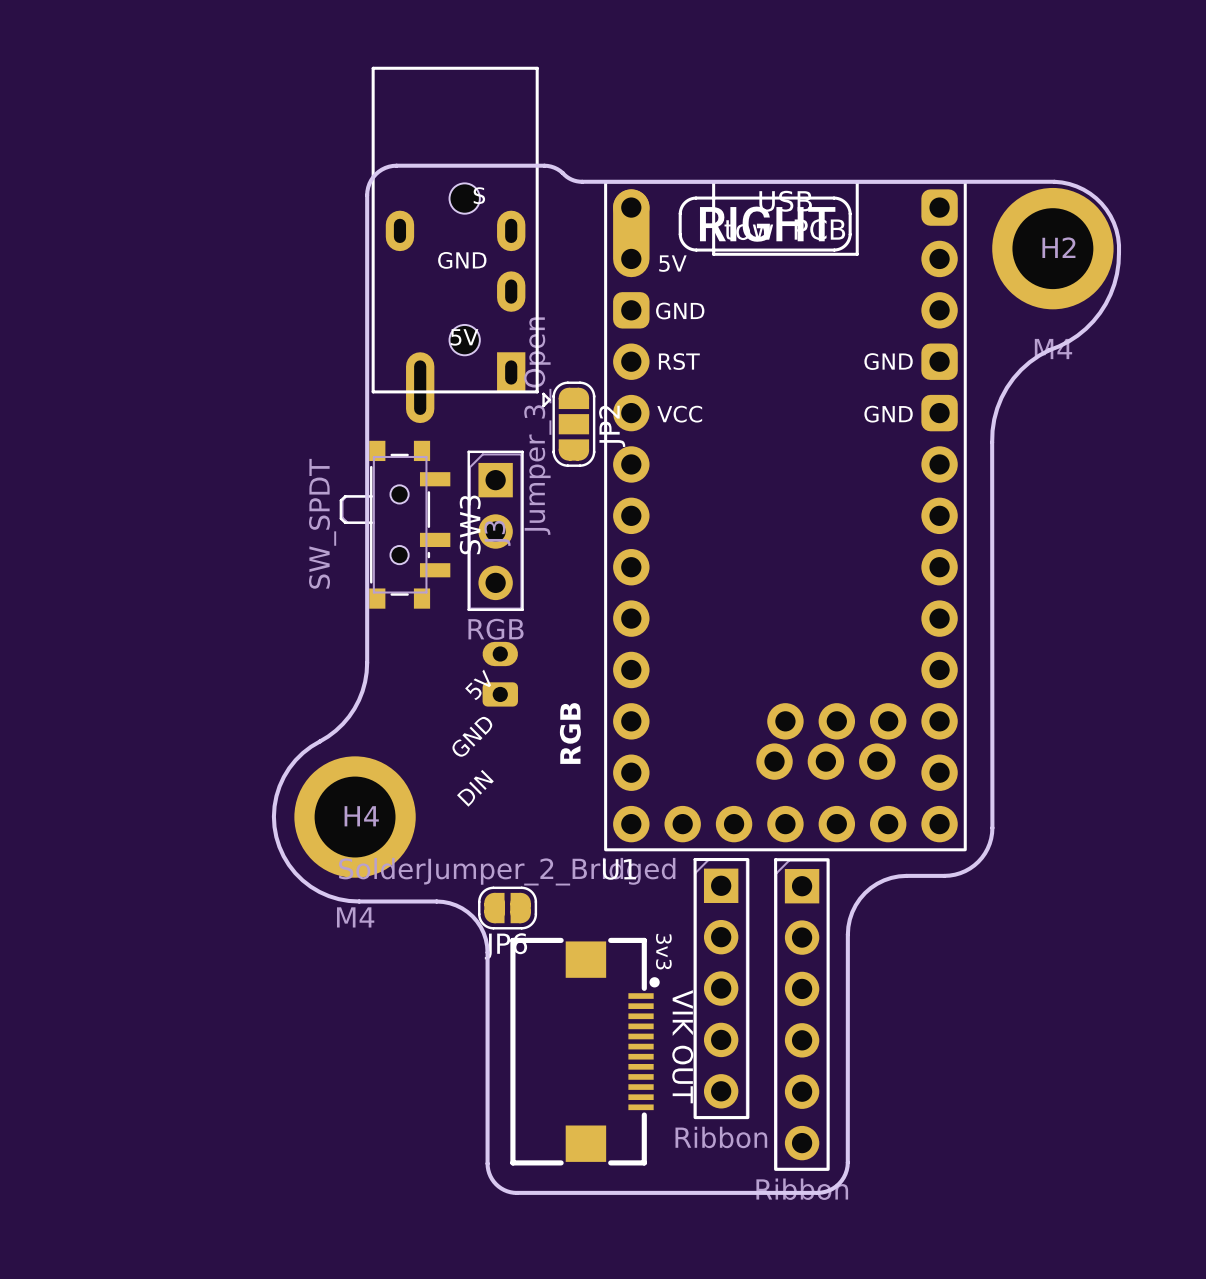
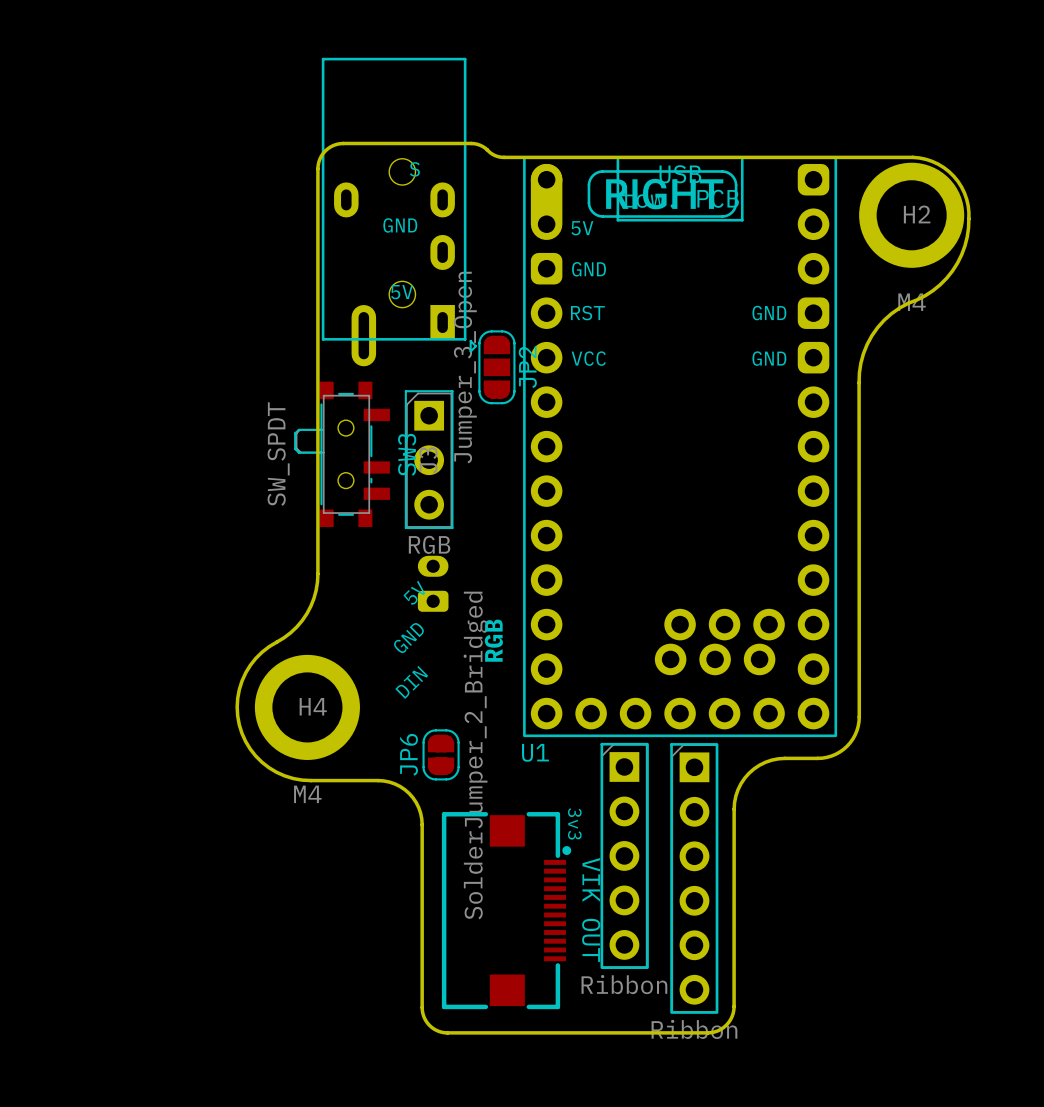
JP6 rotation: 0° (507, 908) -> 90° clockwise (441, 754)
JP6 position: (507, 908) -> (441, 754)

